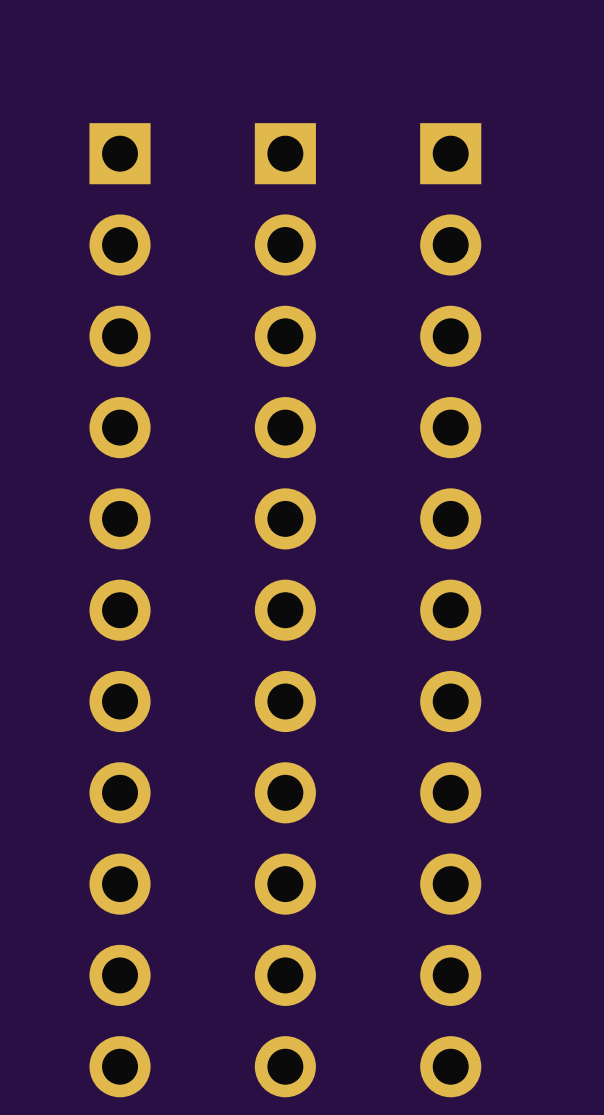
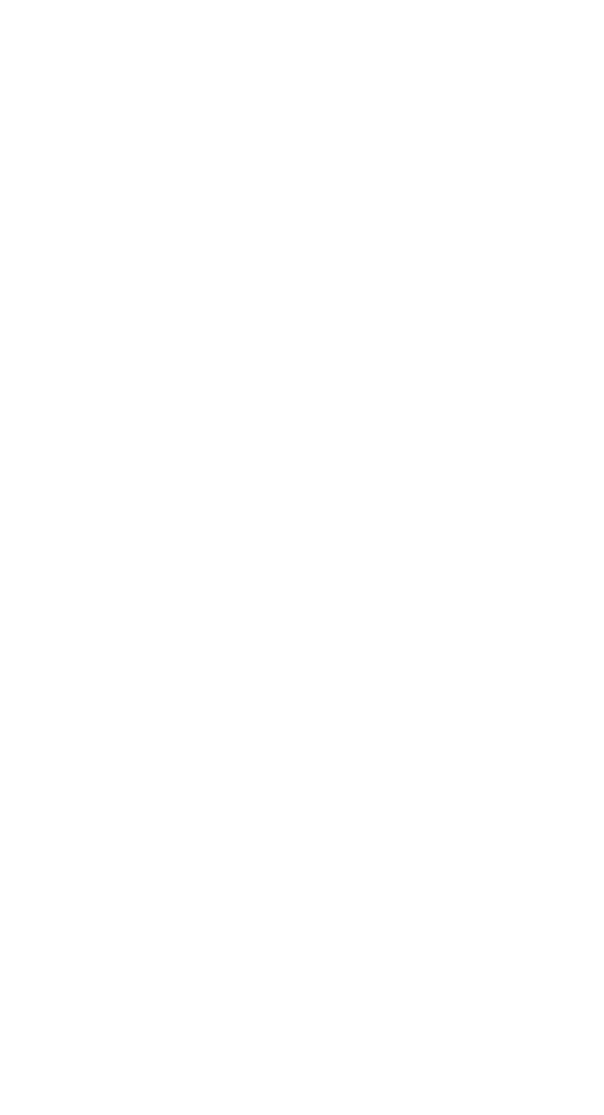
part: (120, 610) -> none
part: (285, 610) -> none
part: (450, 610) -> none

